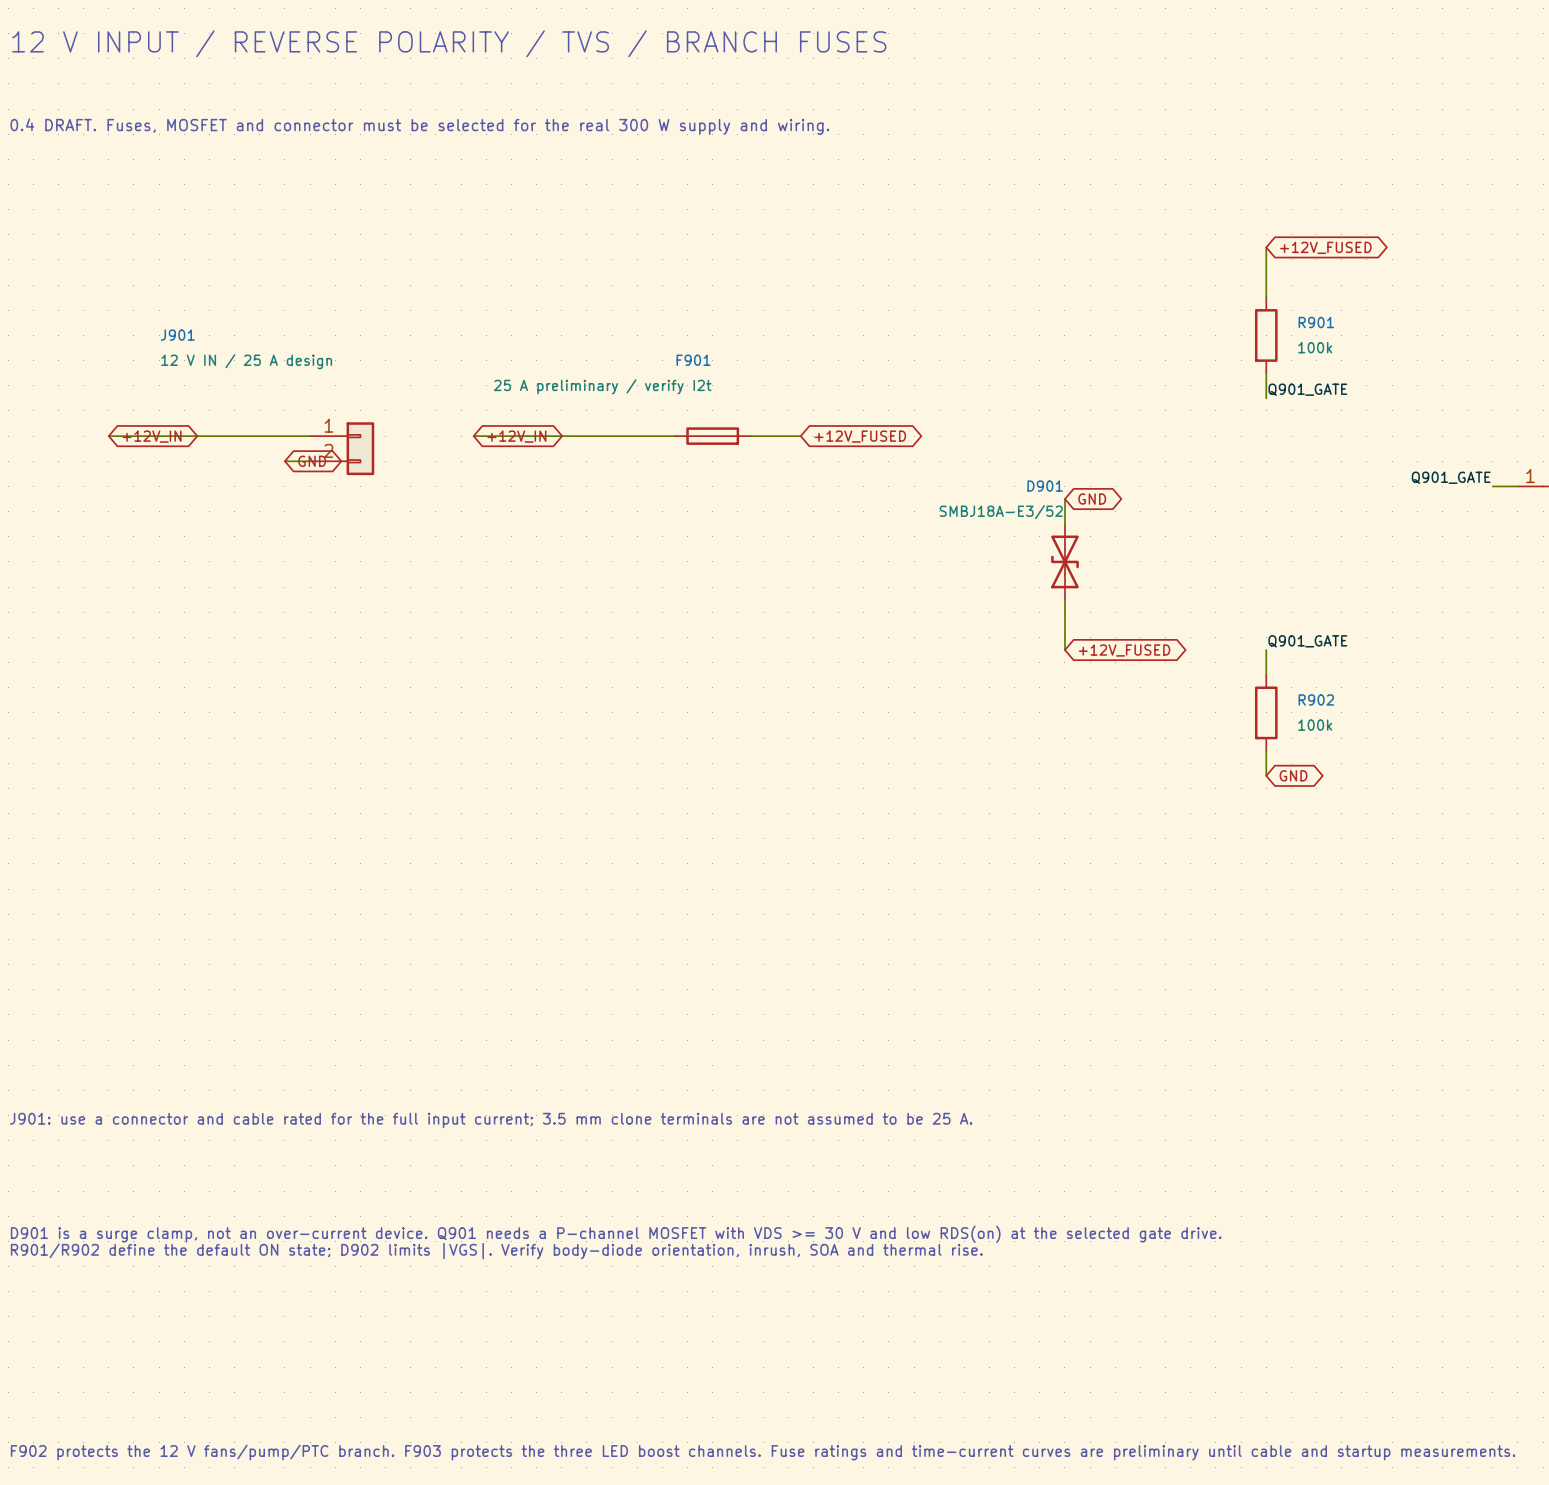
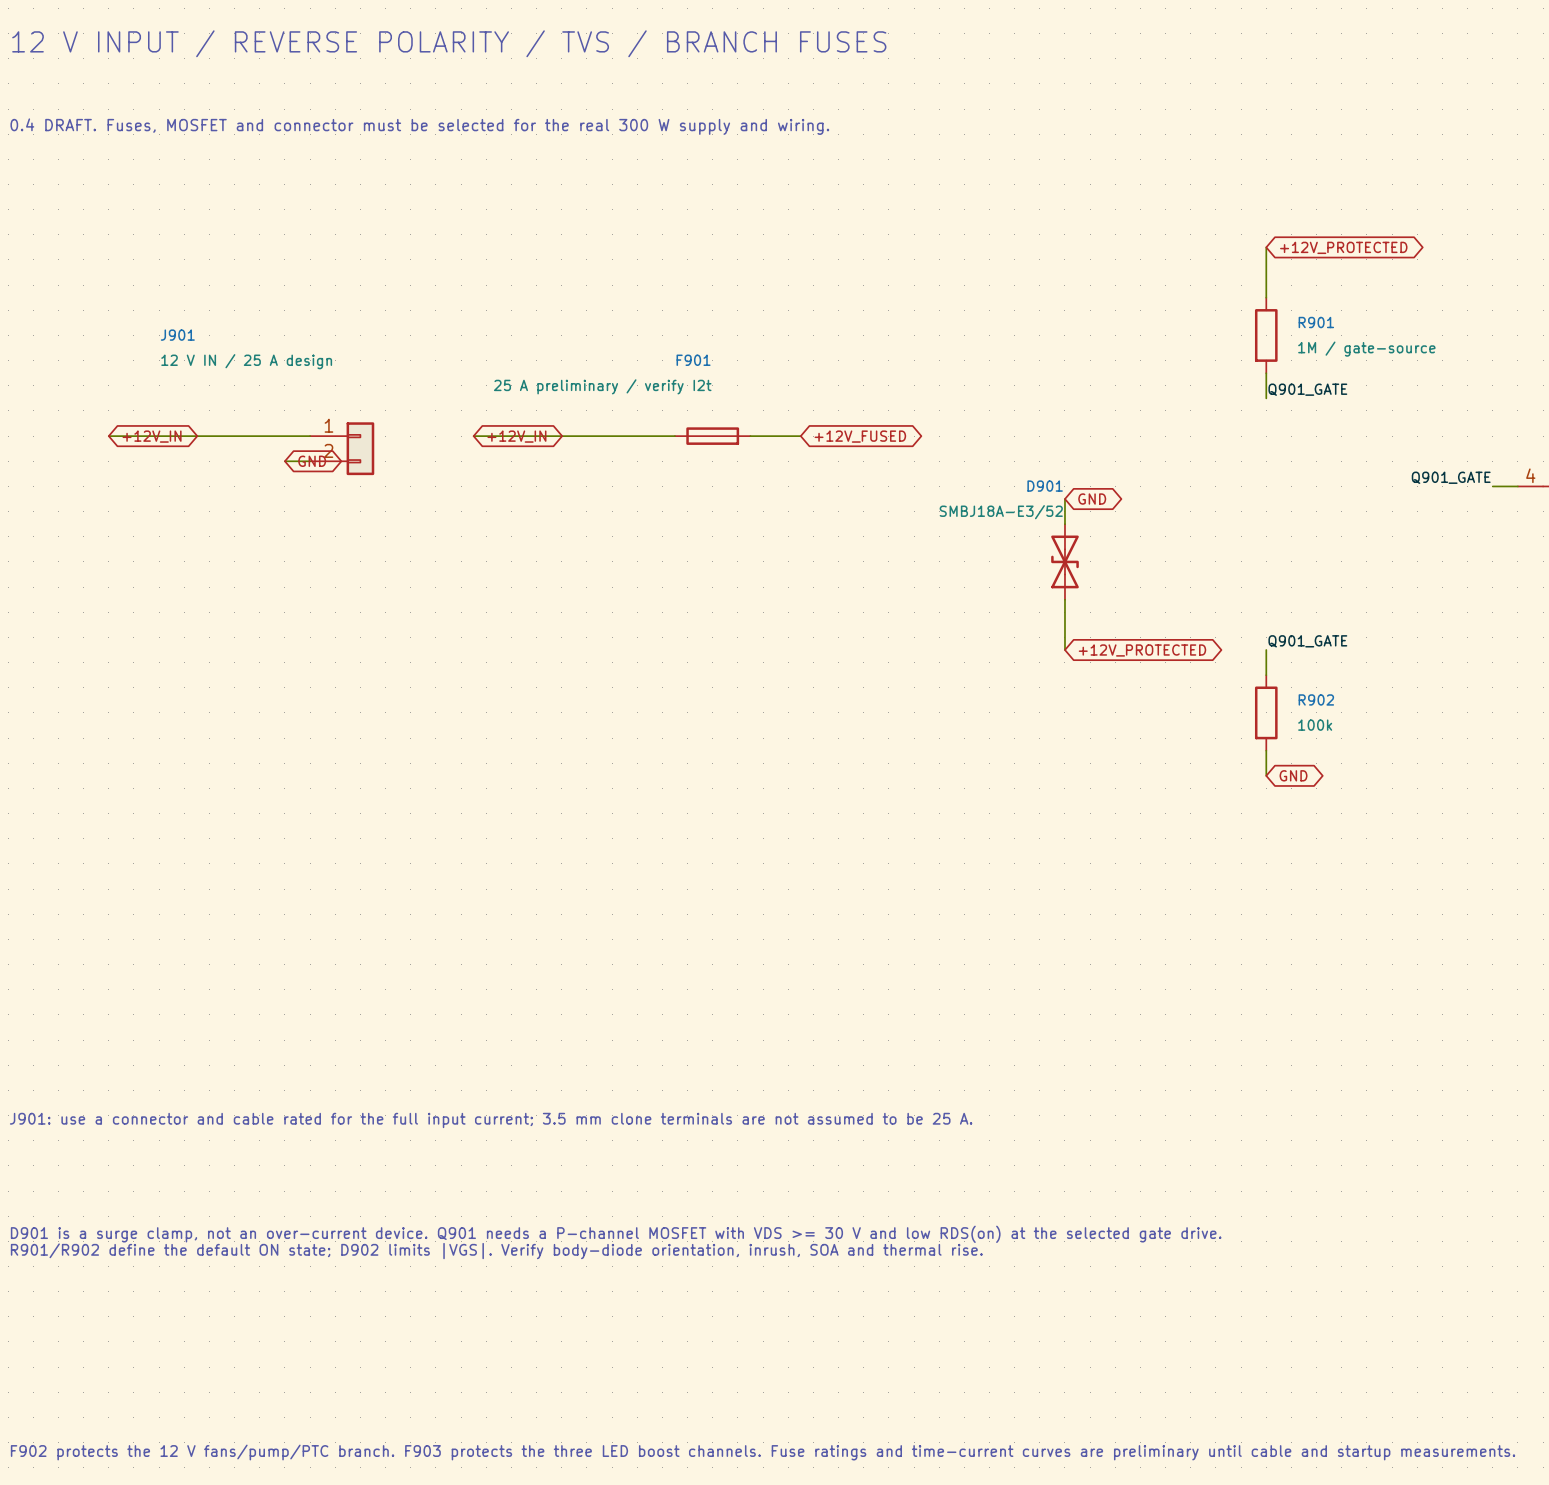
global label: +12V_FUSED (1325, 247) -> +12V_PROTECTED (1343, 247)
R901 value: 100k (1315, 347) -> 1M / gate-source (1366, 349)
part pin number: 1 (1530, 476) -> 4 (1530, 475)
global label: +12V_FUSED (1124, 650) -> +12V_PROTECTED (1142, 650)

